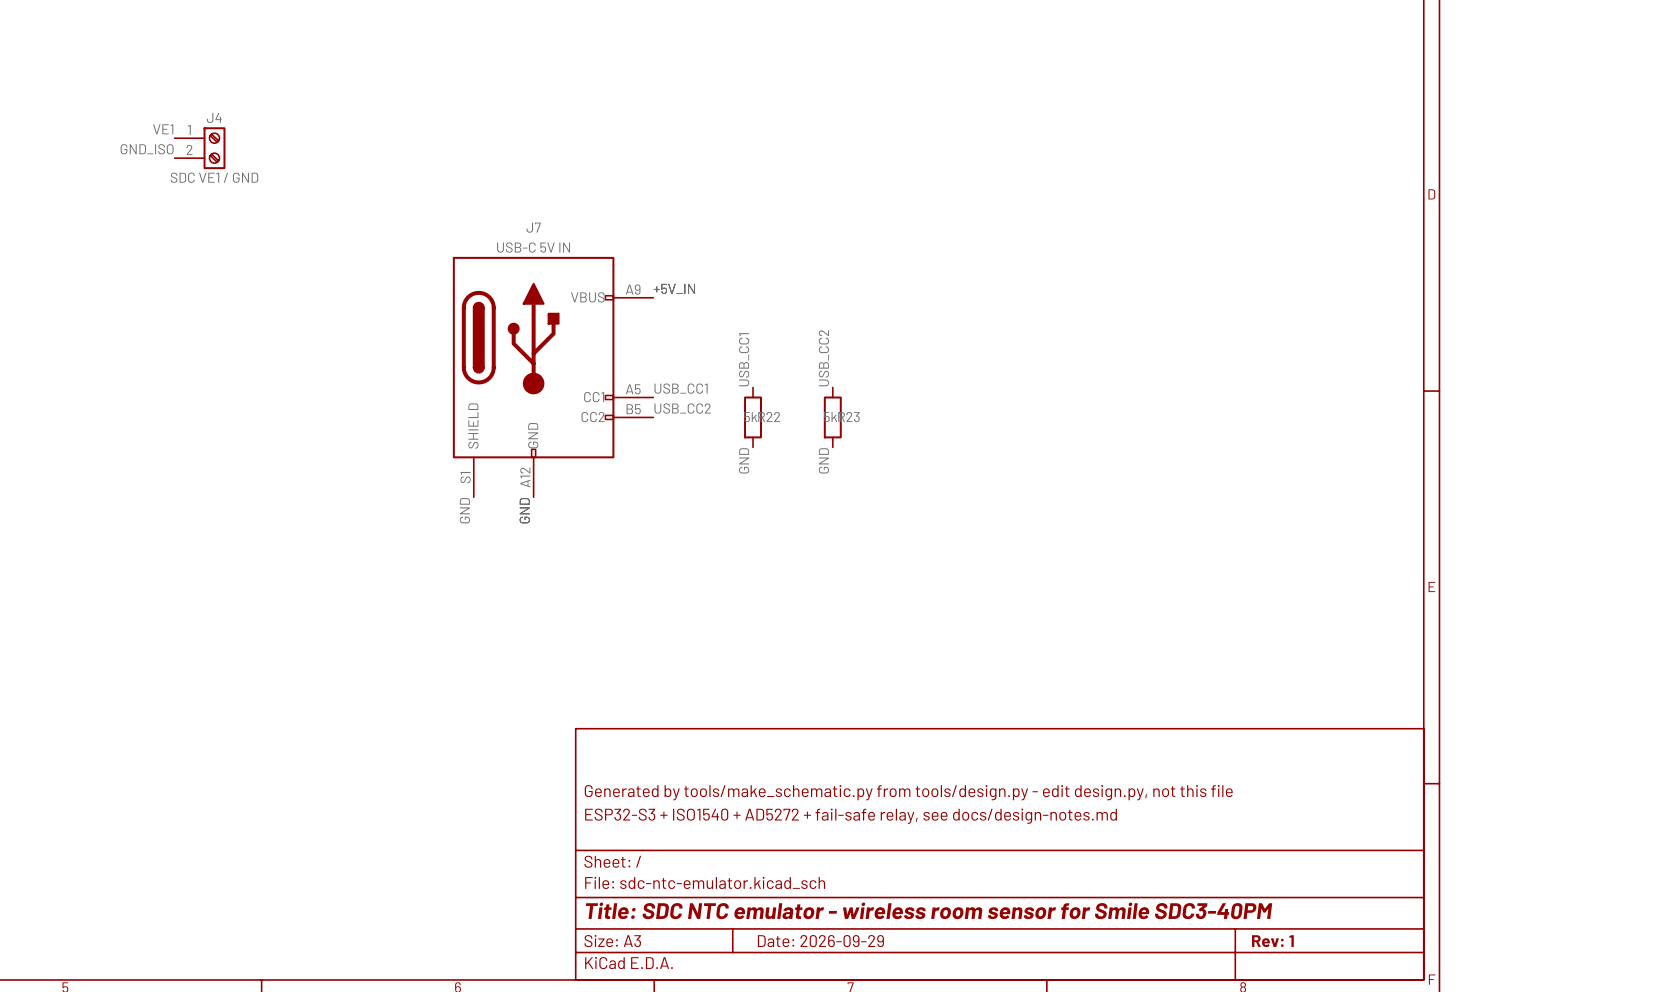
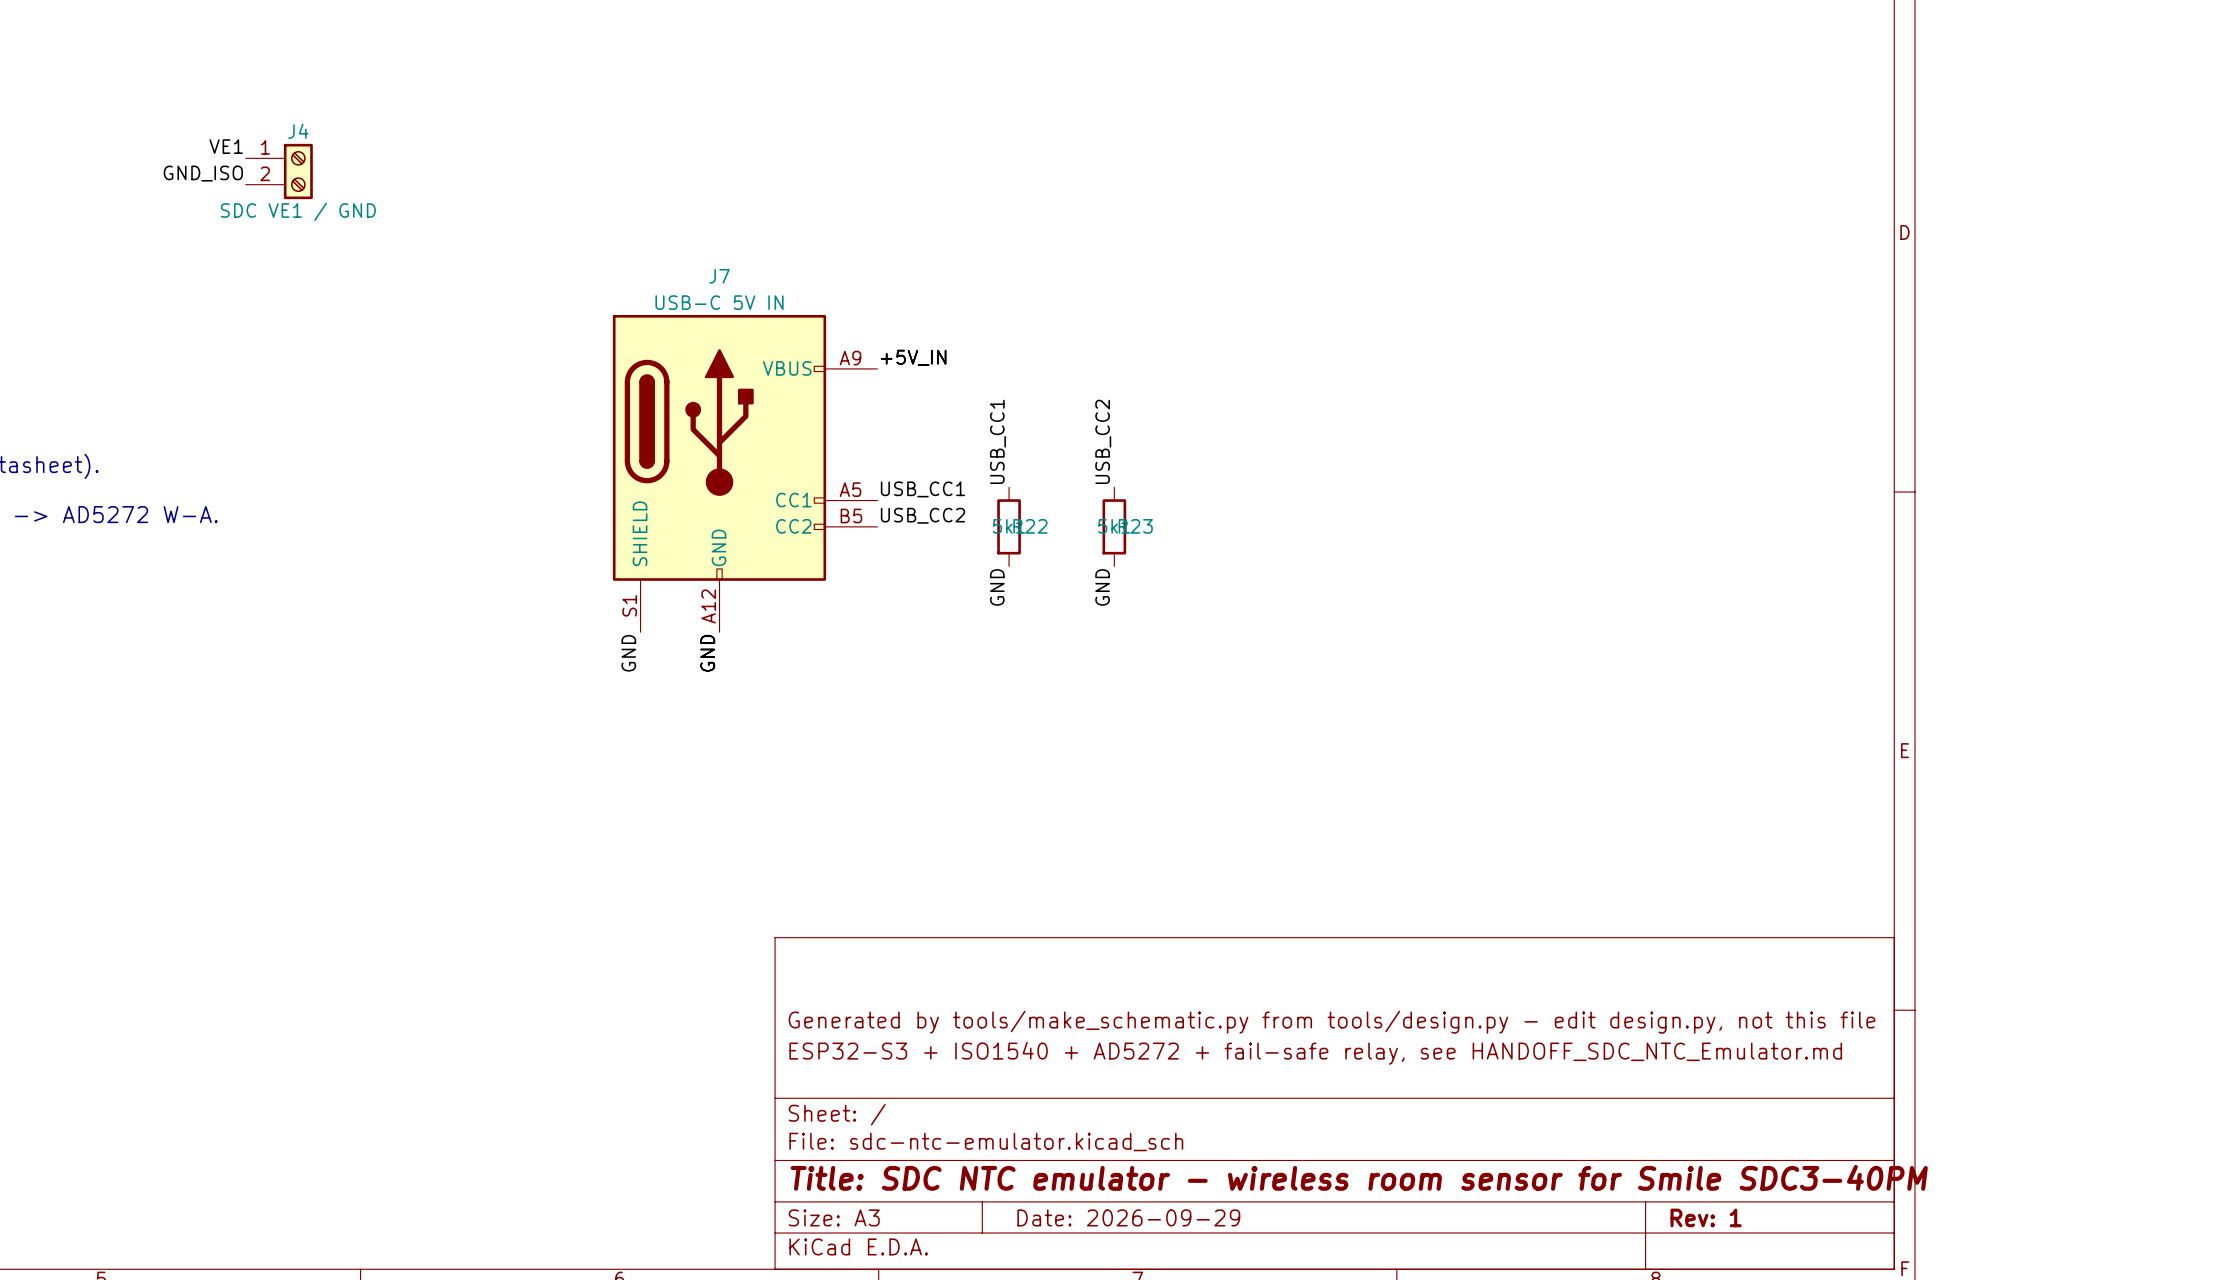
title block: ESP32-S3 + ISO1540 + AD5272 + fail-safe relay, see docs/design-notes.md (851, 816) -> ESP32-S3 + ISO1540 + AD5272 + fail-safe relay, see HANDOFF_SDC_NTC_Emulator.md (1315, 1053)

